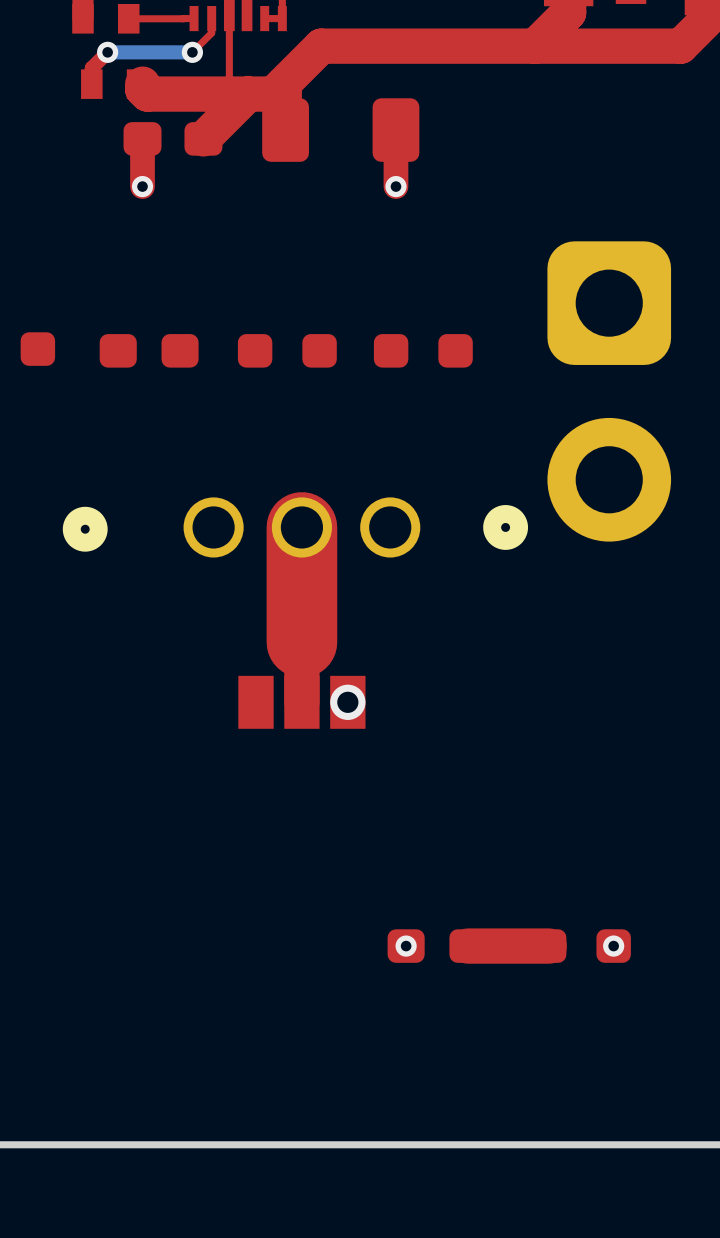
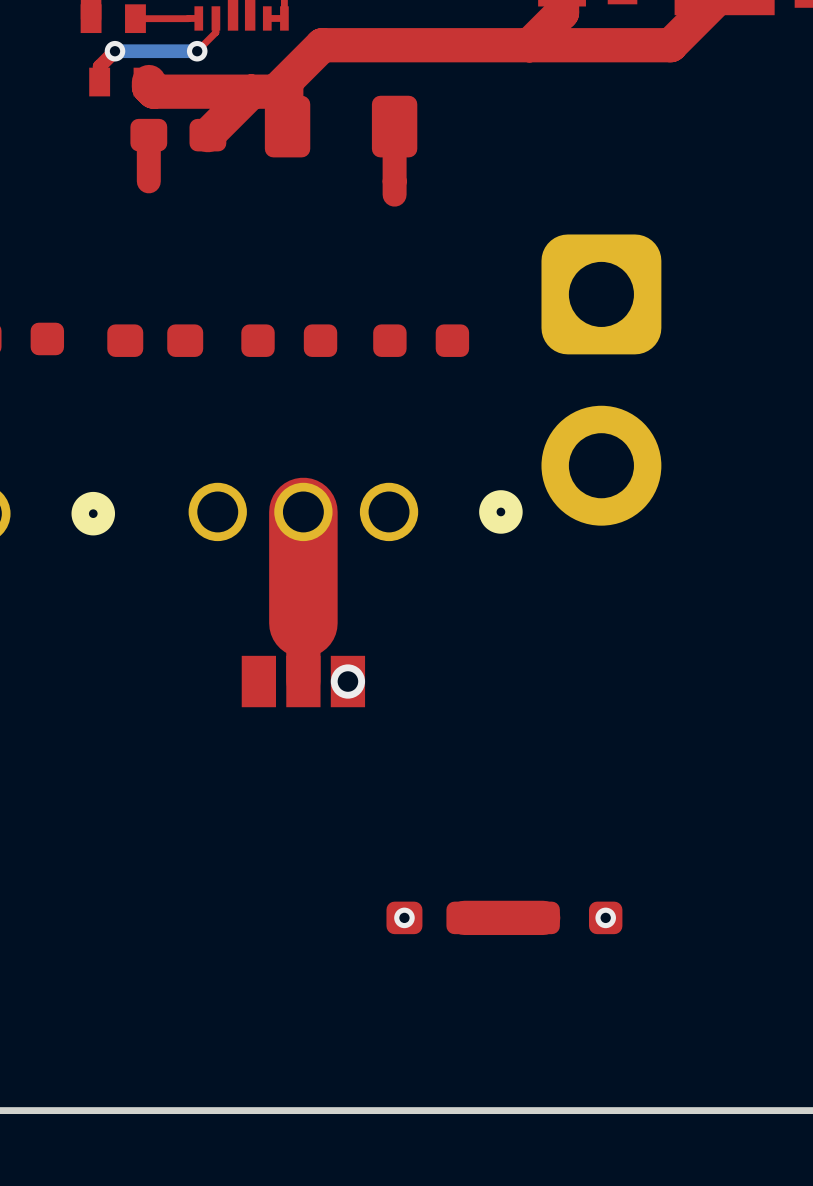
top track: (229, 11) (229, 93) -> none
via: (142, 186) -> none
top track: none -> (394, 181) (394, 194)
via: (395, 186) -> none

